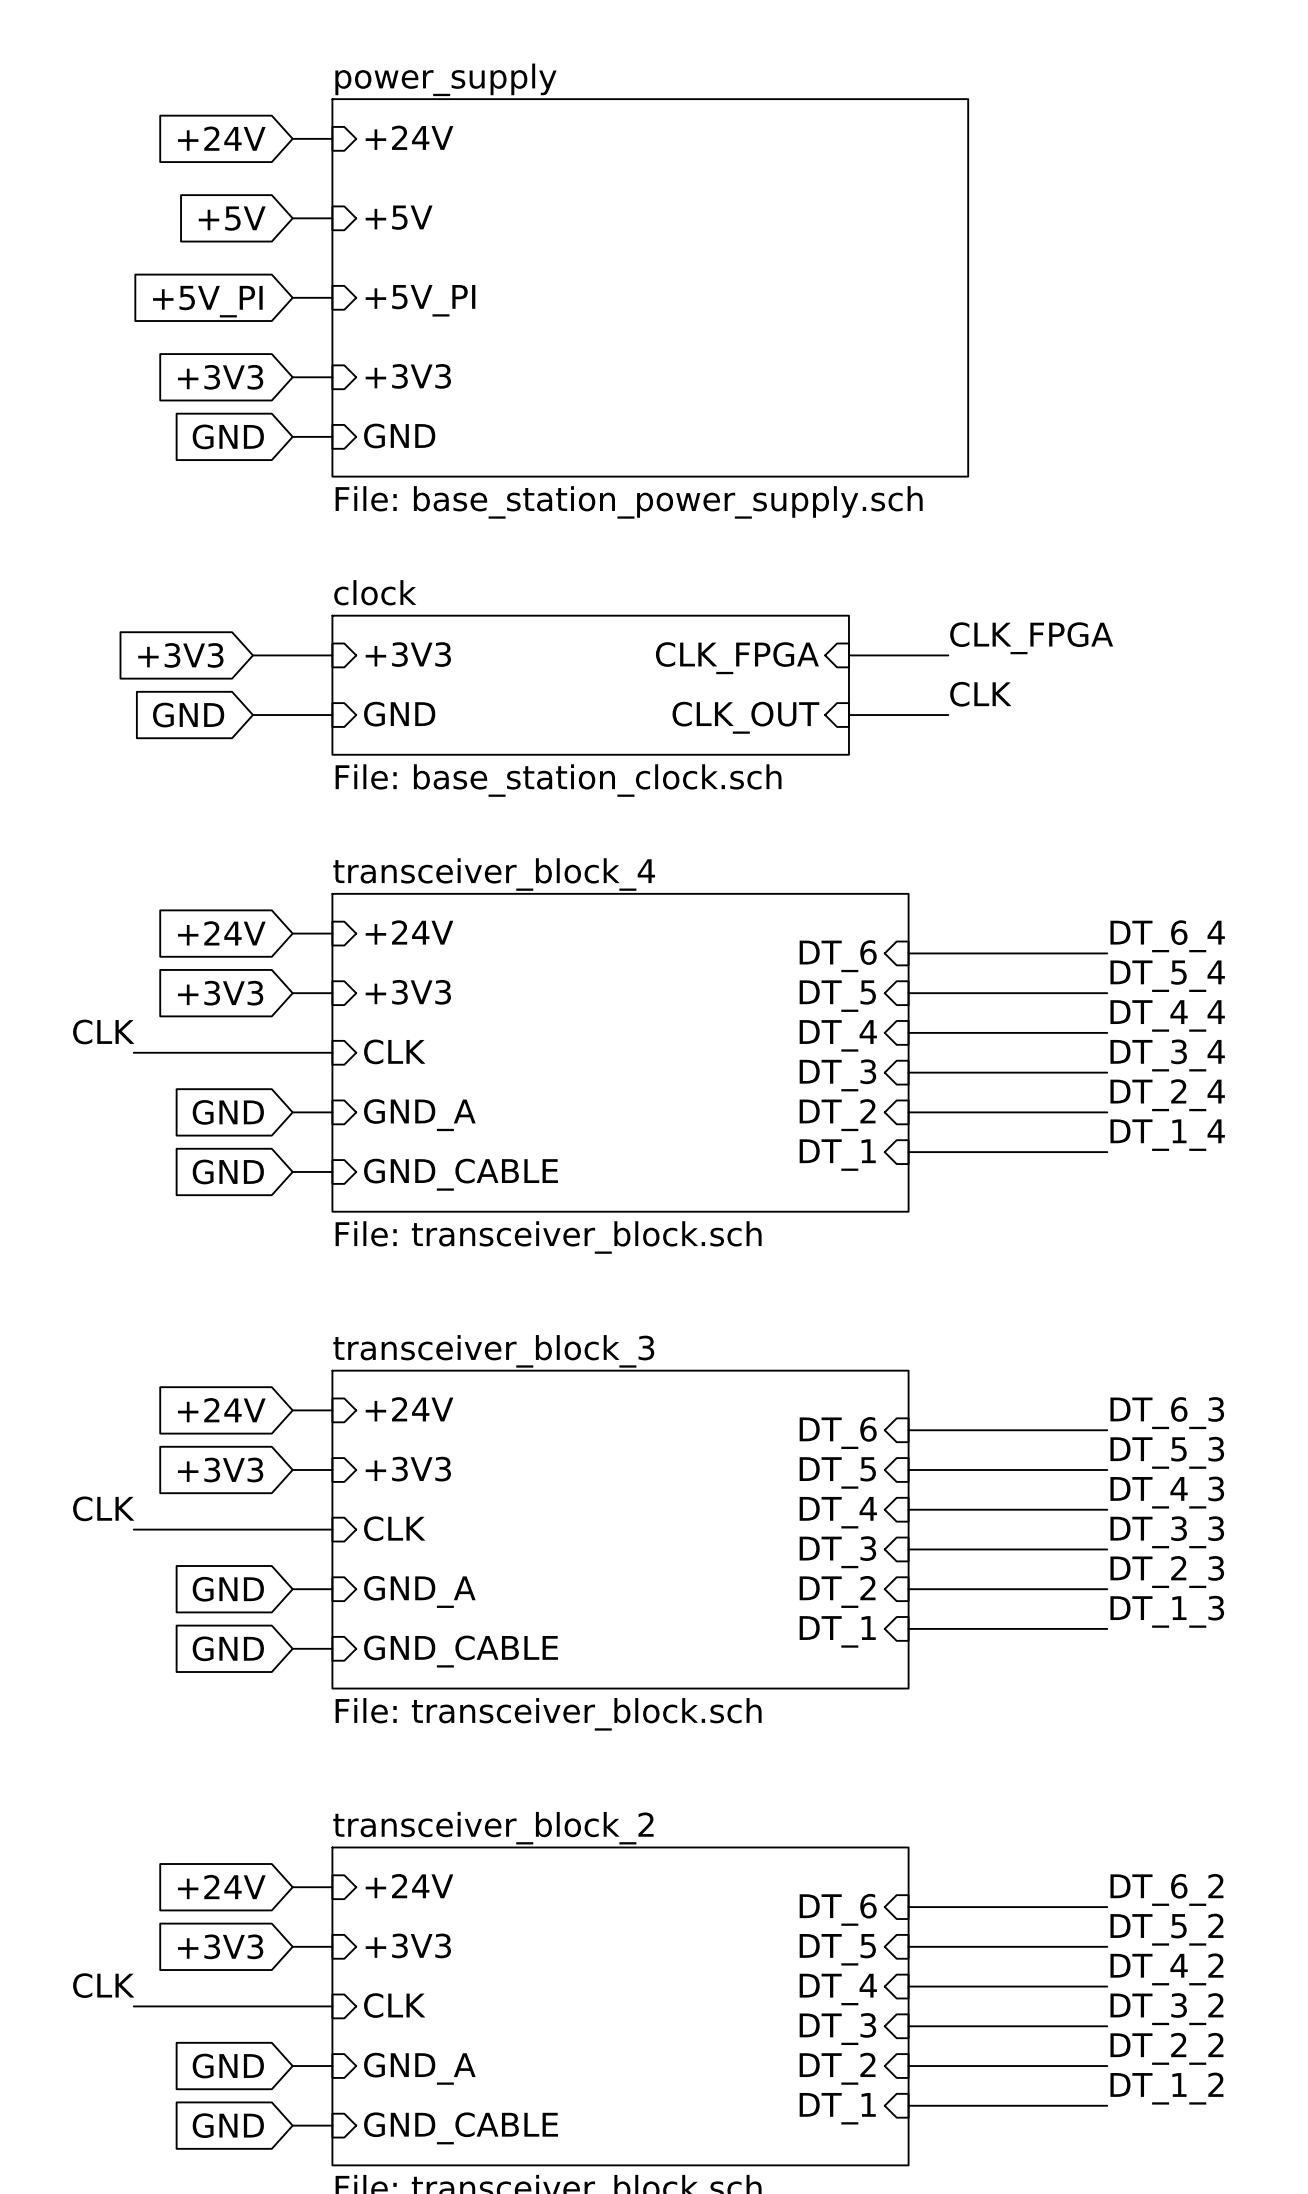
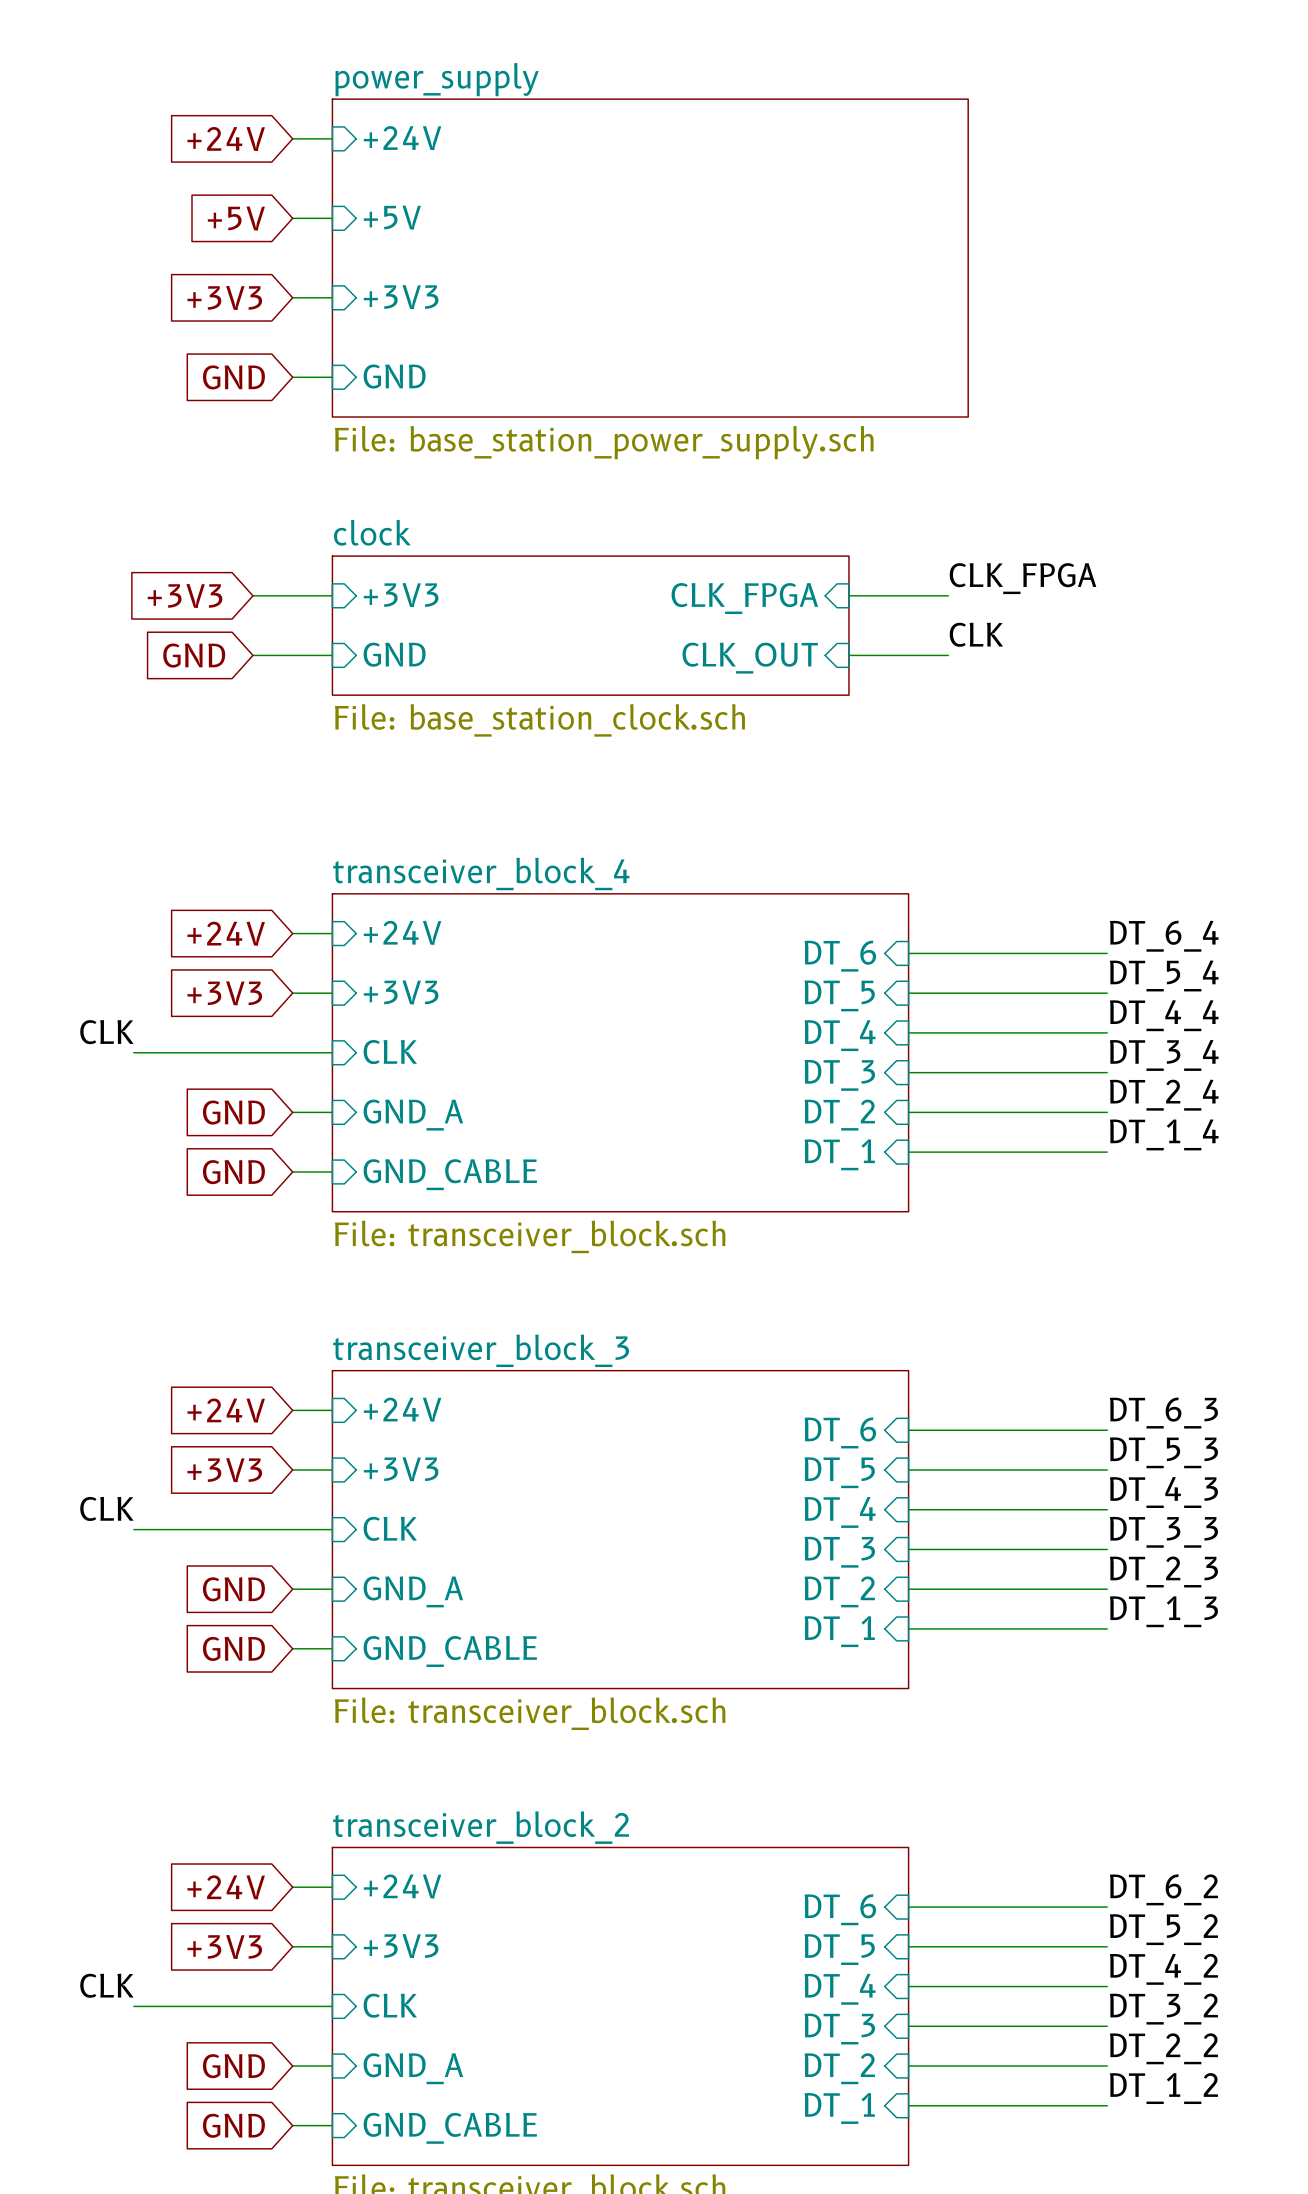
sheet power_supply: none -> File: base_station_power_supply.sch (650, 258)
sheet power_supply: File: base_station_power_supply.sch (650, 287) -> none
sheet pin: +5V_PI (420, 300) -> +3V3 (401, 297)
global label: +5V_PI (207, 301) -> +3V3 (224, 297)
sheet pin: +3V3 (408, 376) -> GND (394, 376)
global label: +3V3 (220, 377) -> GND (233, 377)
global label: GND (228, 436) -> none
wire: (292, 436) (332, 436) -> none
sheet pin: GND (399, 436) -> none
label: none -> CLK_FPGA (1023, 578)
sheet pin: none -> +3V3 (401, 595)
global label: none -> +3V3 (185, 595)
sheet pin: none -> CLK_FPGA (744, 598)
label: CLK_FPGA (1031, 638) -> CLK (976, 634)
sheet pin: +3V3 (408, 654) -> GND (394, 654)
global label: +3V3 (180, 655) -> GND (194, 655)
sheet pin: CLK_FPGA (737, 658) -> CLK_OUT (750, 658)
sheet clock position: (590, 685) -> (590, 625)
label: CLK (980, 694) -> none
sheet pin: GND (399, 714) -> none
global label: GND (188, 715) -> none
wire: (252, 715) (332, 715) -> (252, 595) (332, 595)
wire: (848, 715) (948, 715) -> (848, 595) (948, 595)
sheet pin: CLK_OUT (745, 717) -> none

